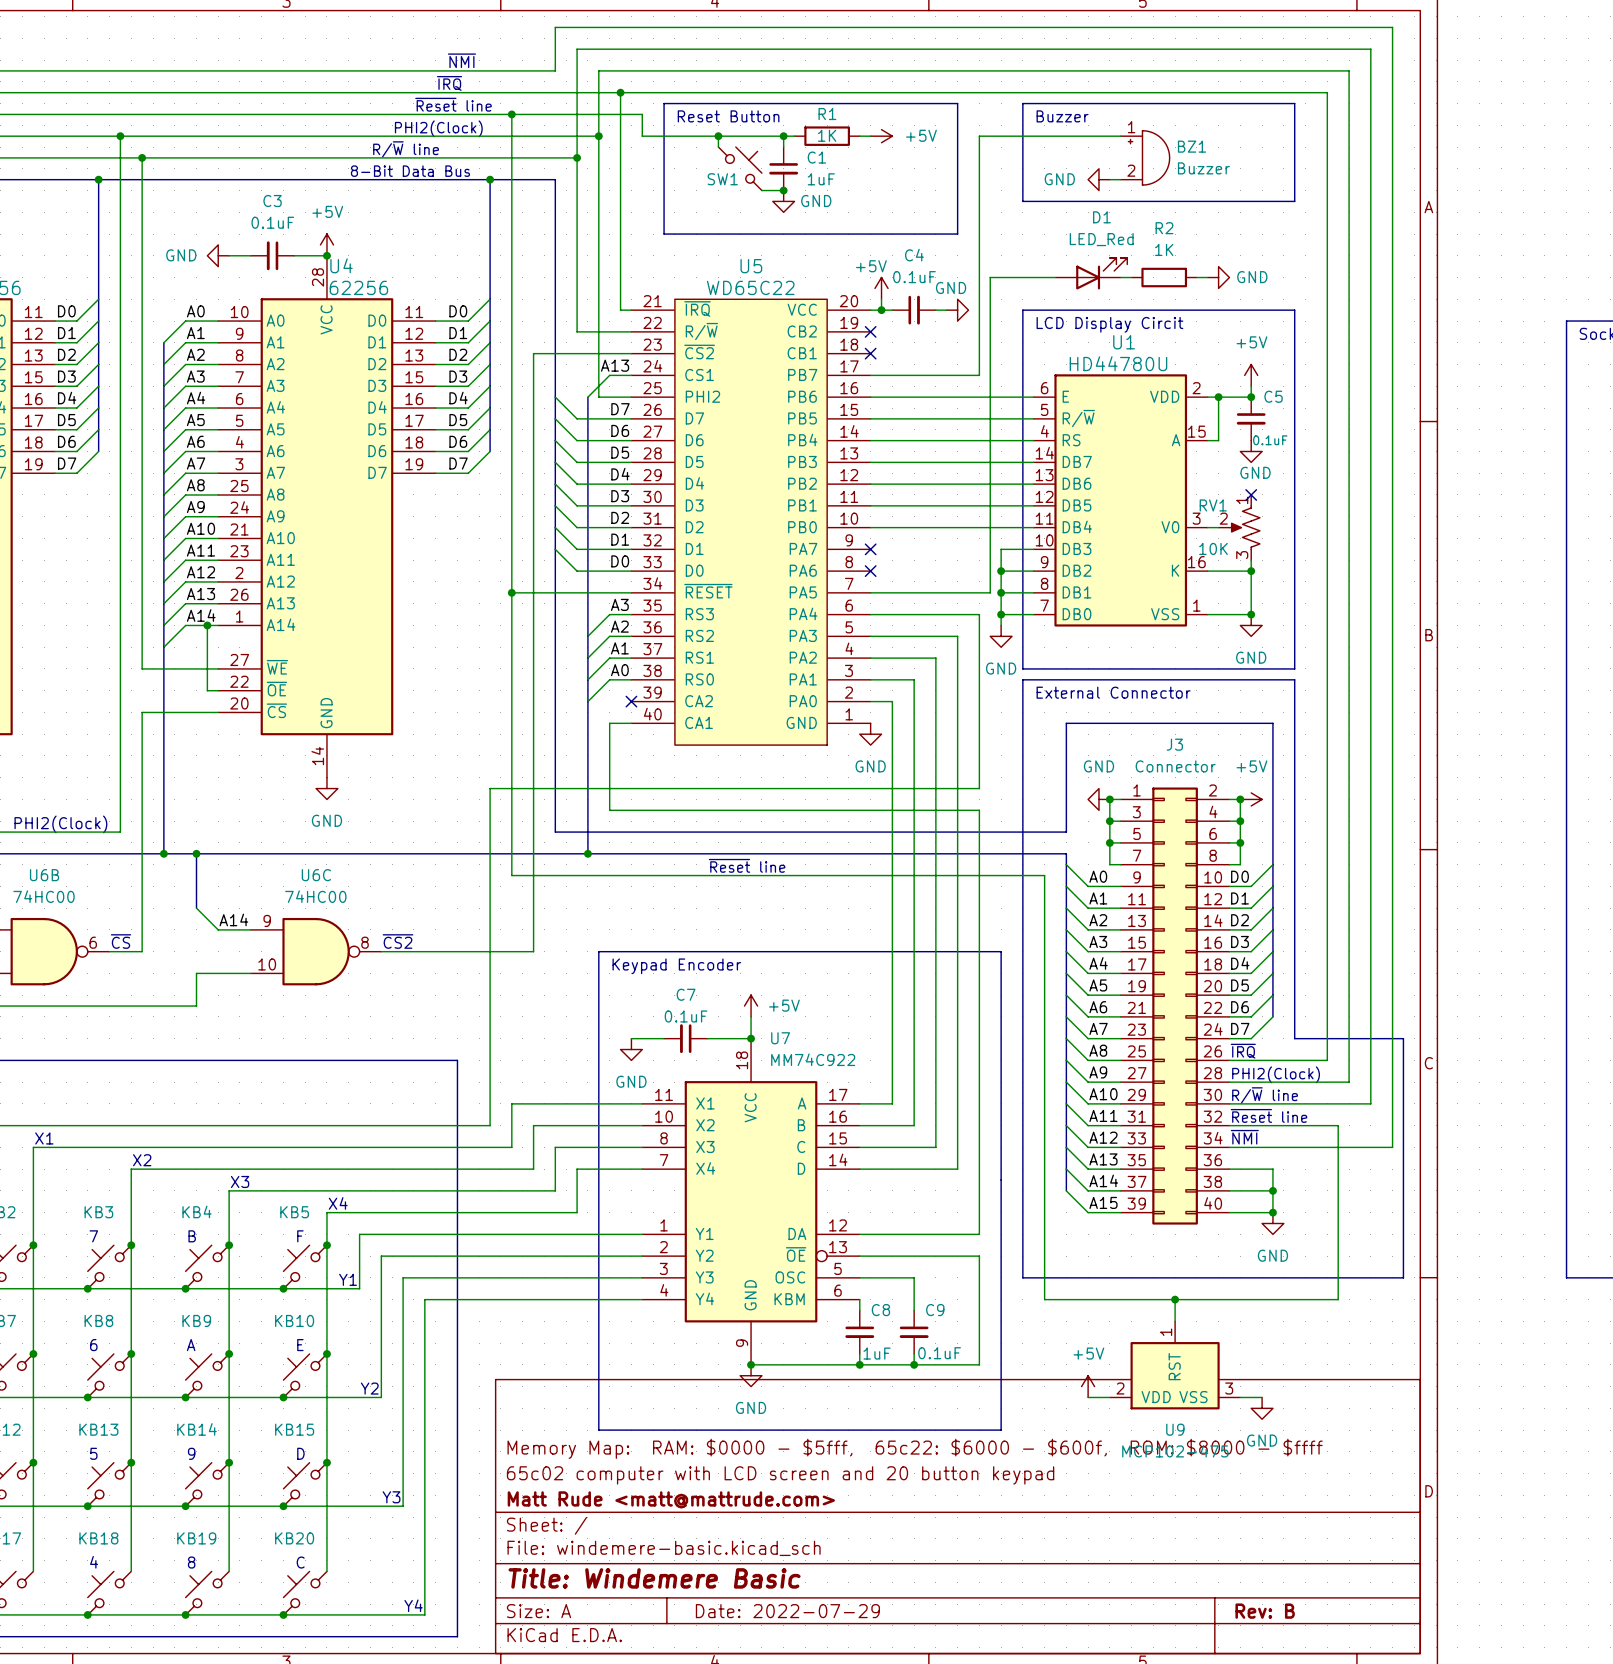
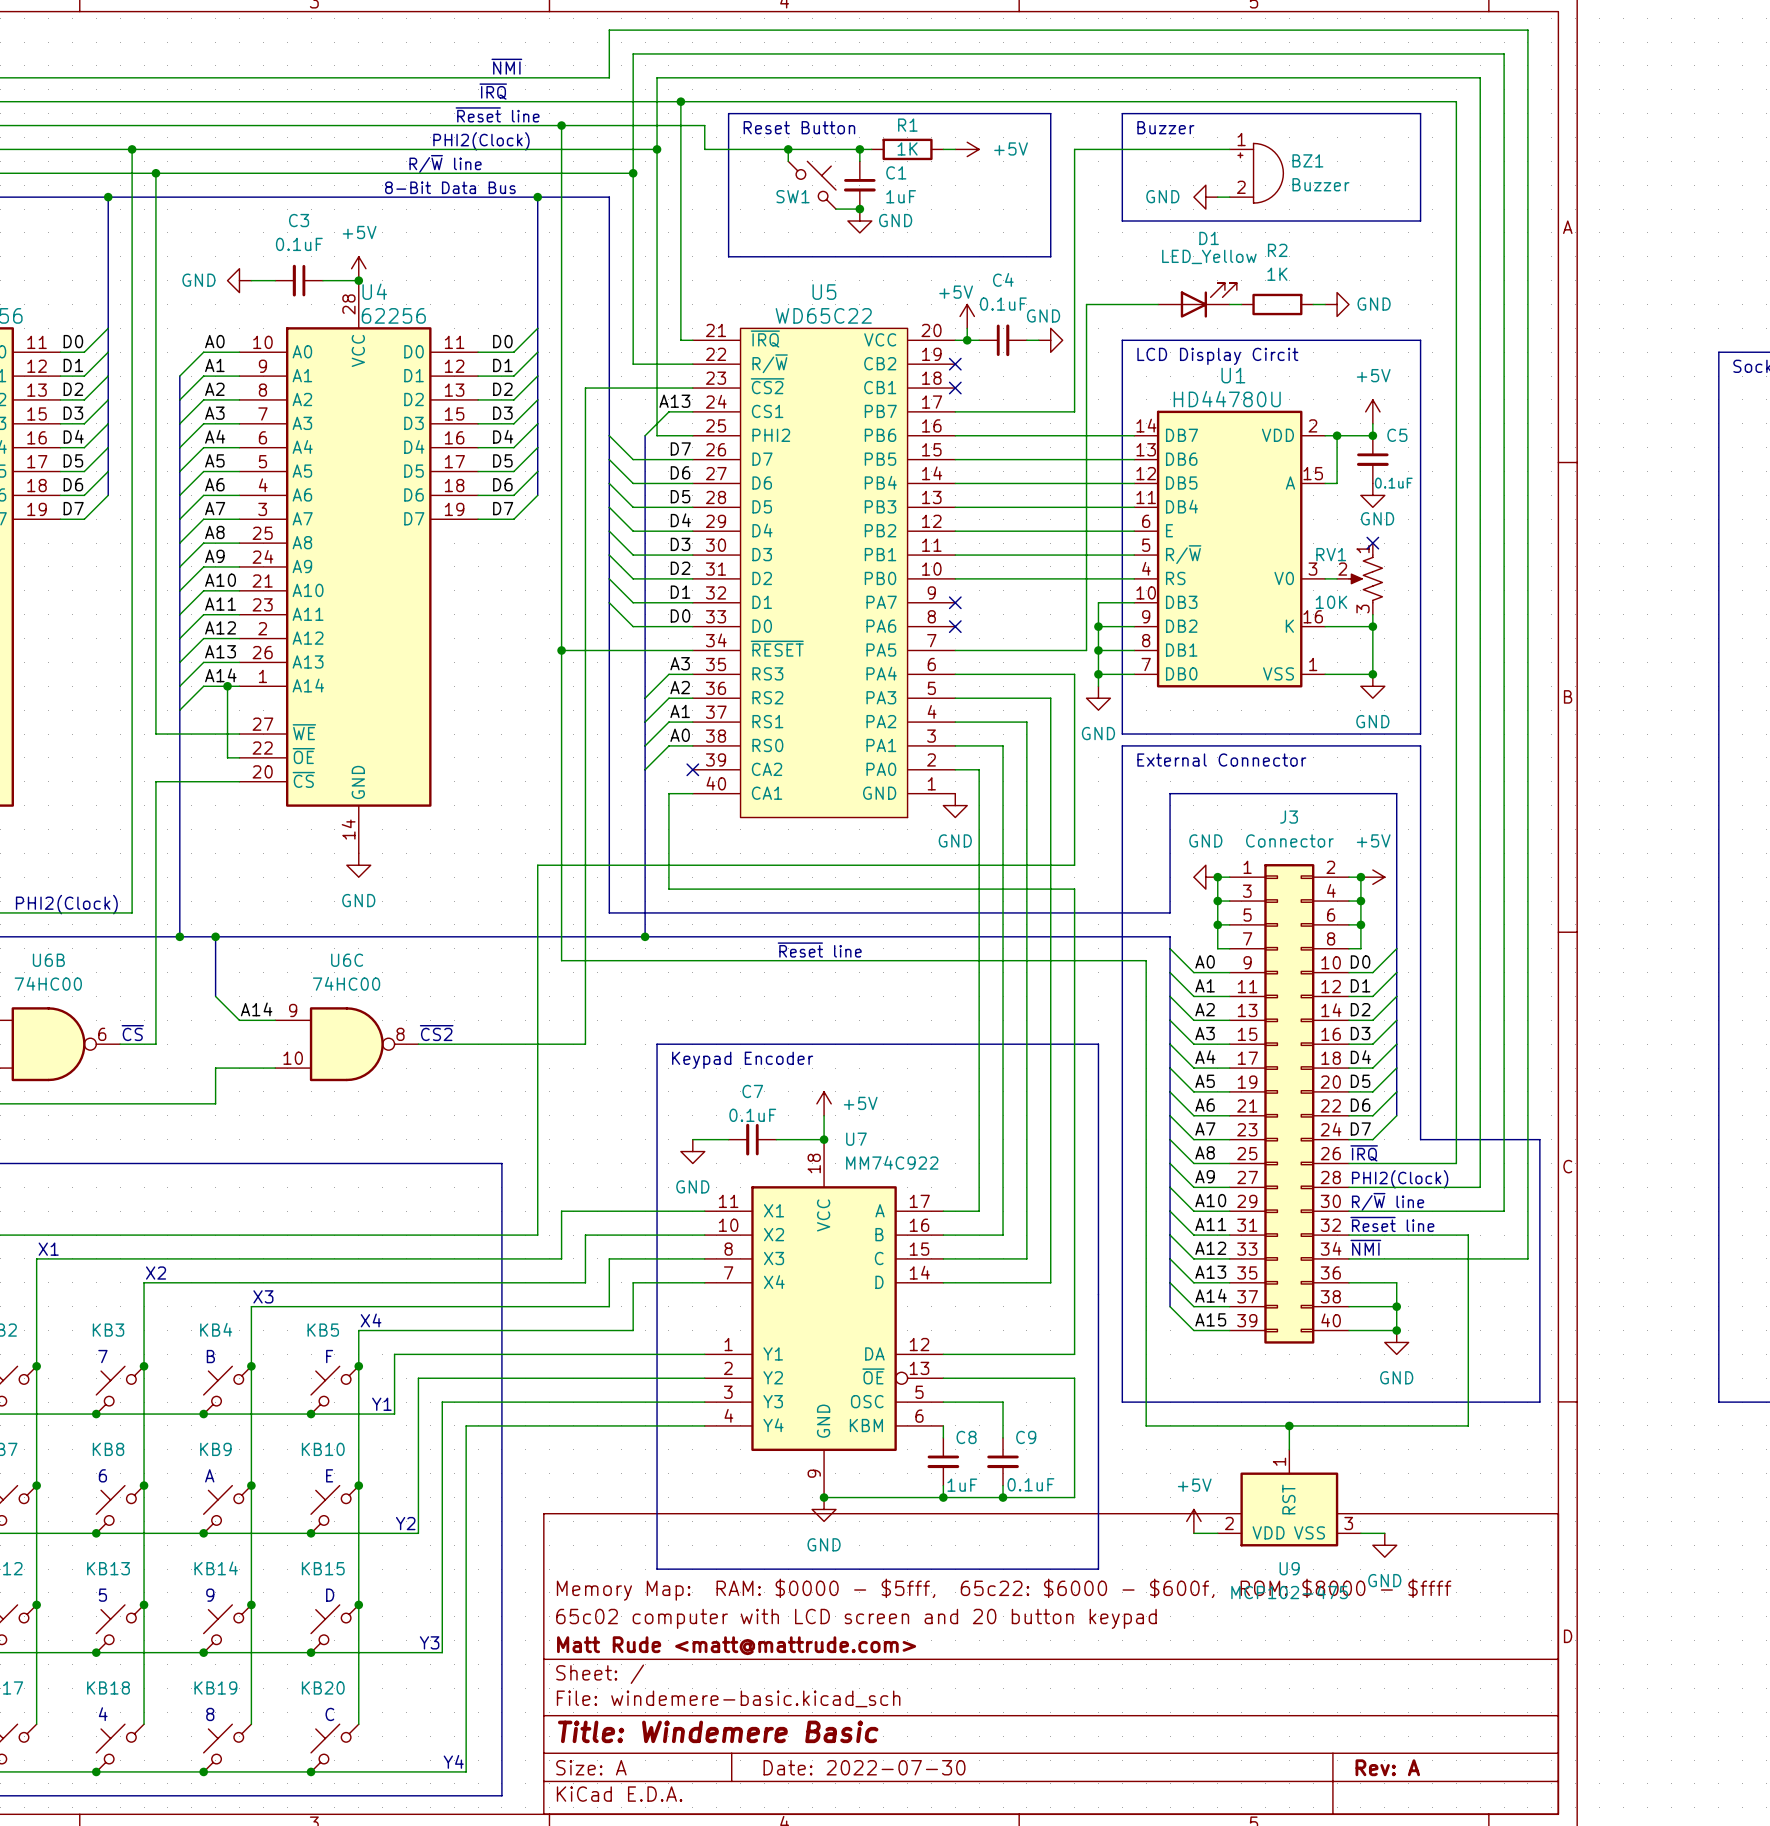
D1 value: LED_Red (1101, 239) -> LED_Yellow (1209, 256)
U1 symbol: [1033, 374, 1208, 627] -> [1134, 410, 1326, 688]
title block: Date: 2022-07-29 (787, 1611) -> Date: 2022-07-30 (864, 1767)
title block: Rev: B (1265, 1611) -> Rev: A (1387, 1767)

